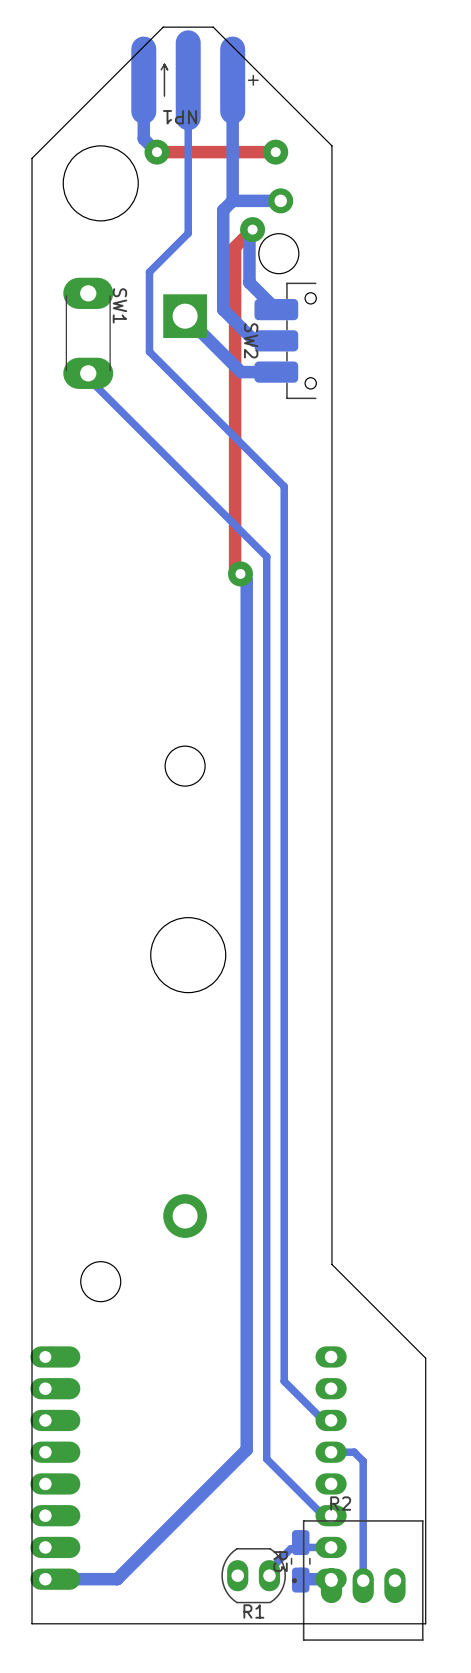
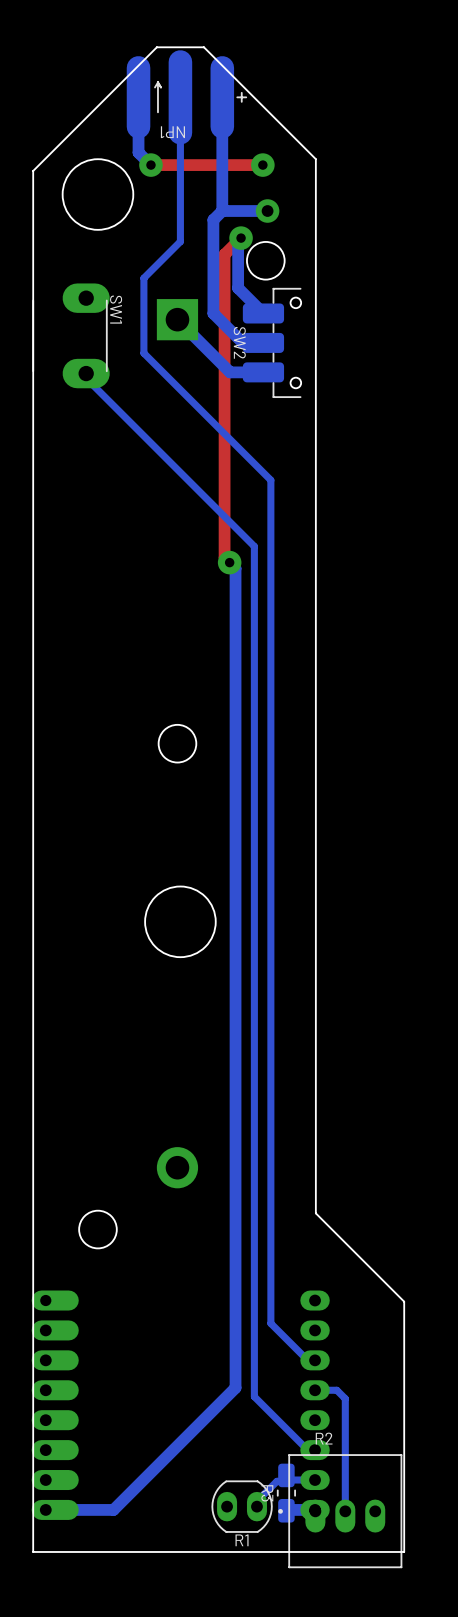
SW1 footprint: [63, 277, 114, 389] -> [32, 283, 110, 389]

